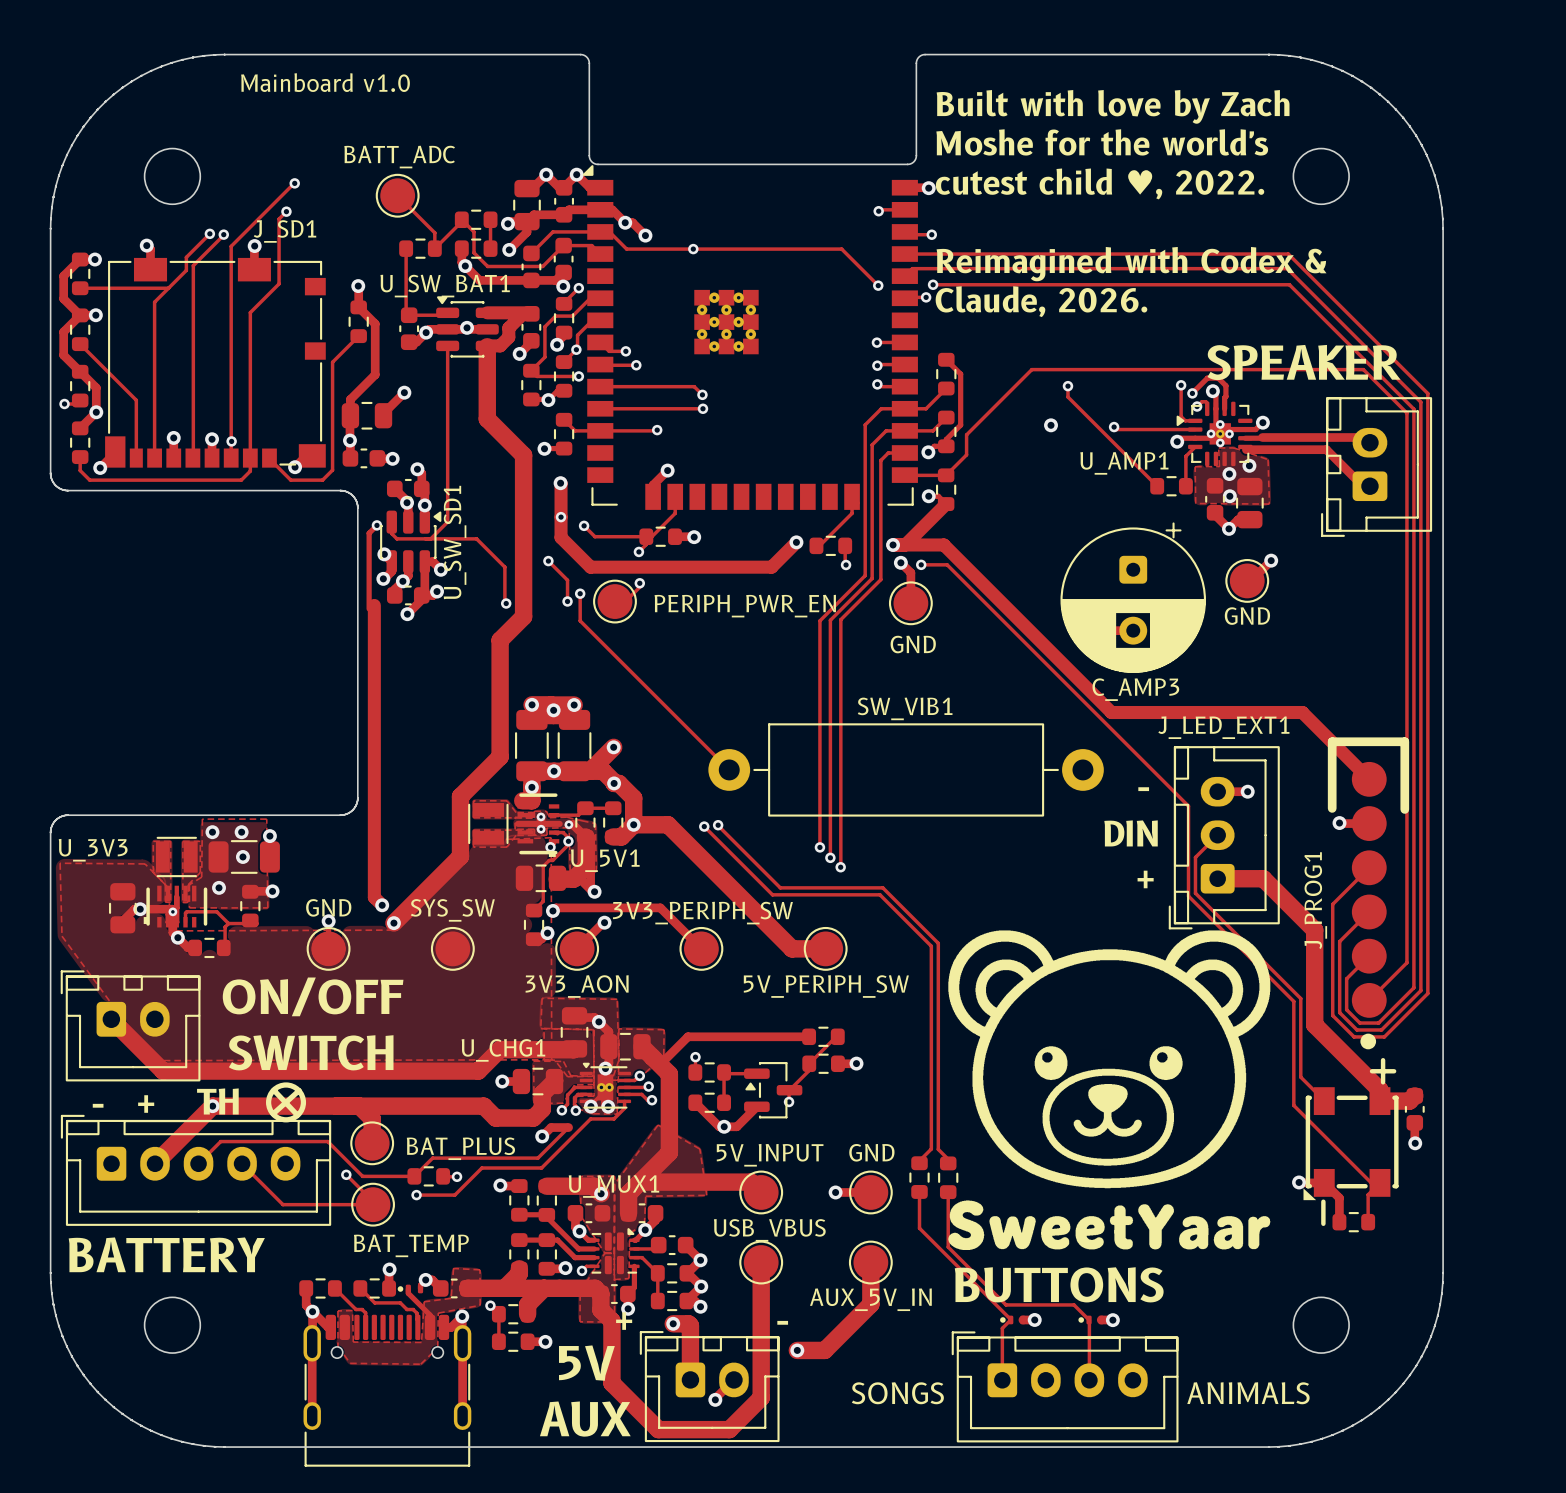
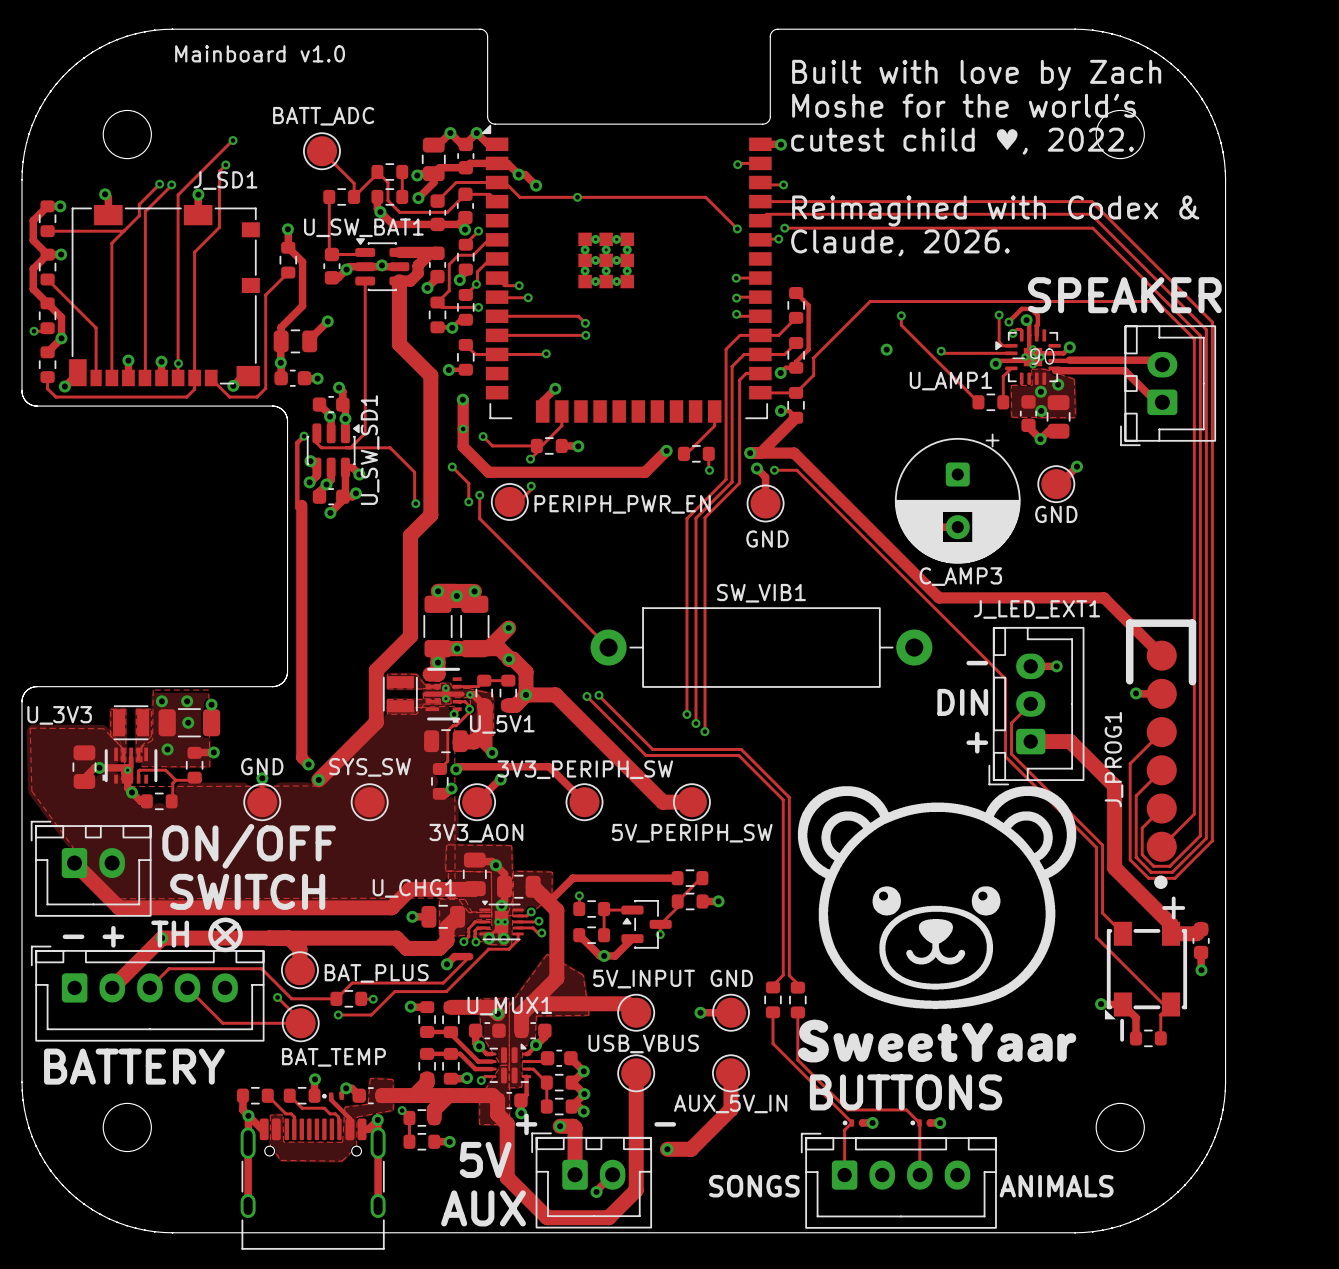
U_AMP1 text: none -> -90 (1033, 356)

